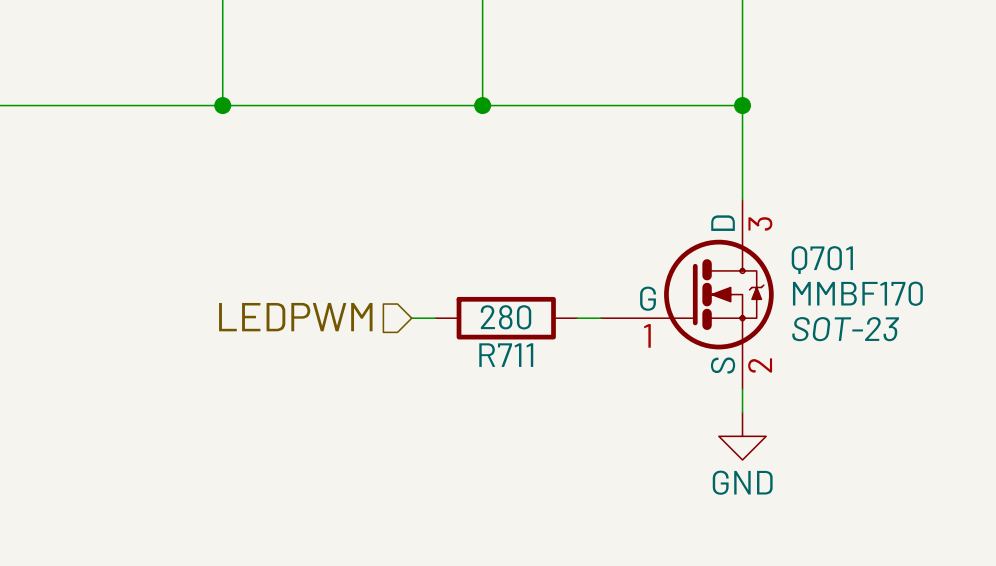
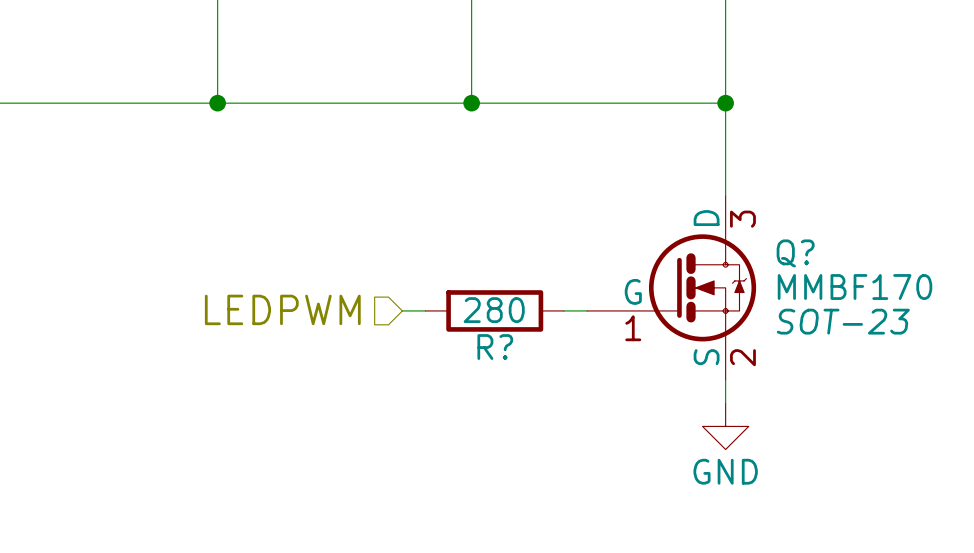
Q701 name: Q701 (822, 260) -> Q? (795, 253)
R711 name: R711 (506, 355) -> R? (495, 347)

